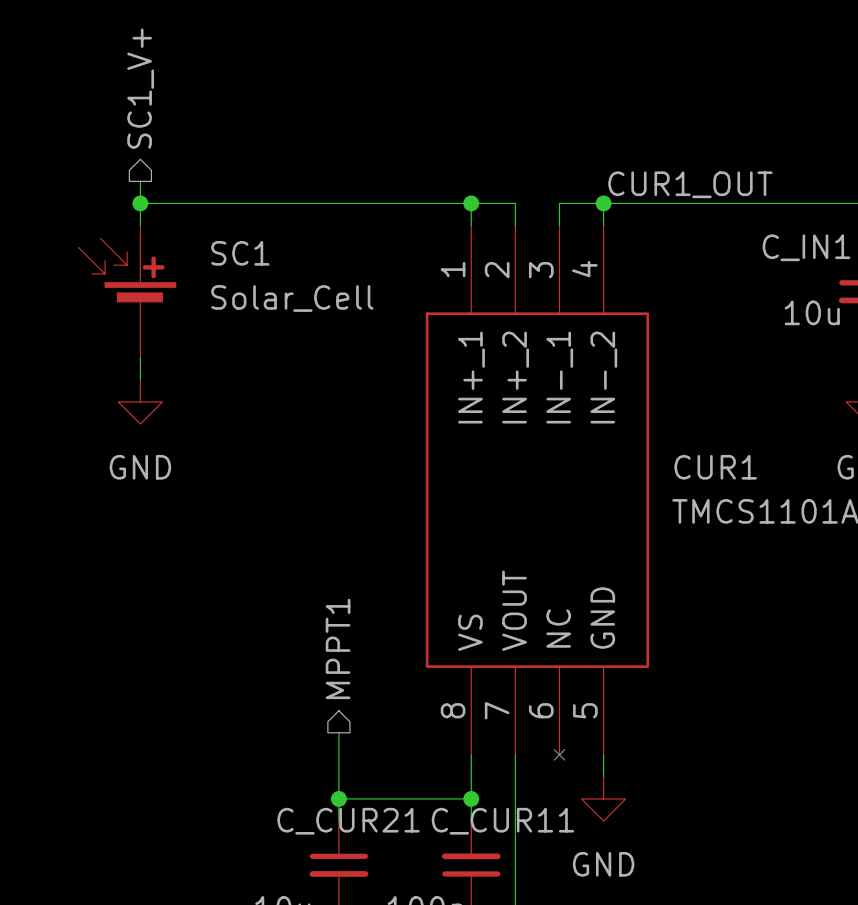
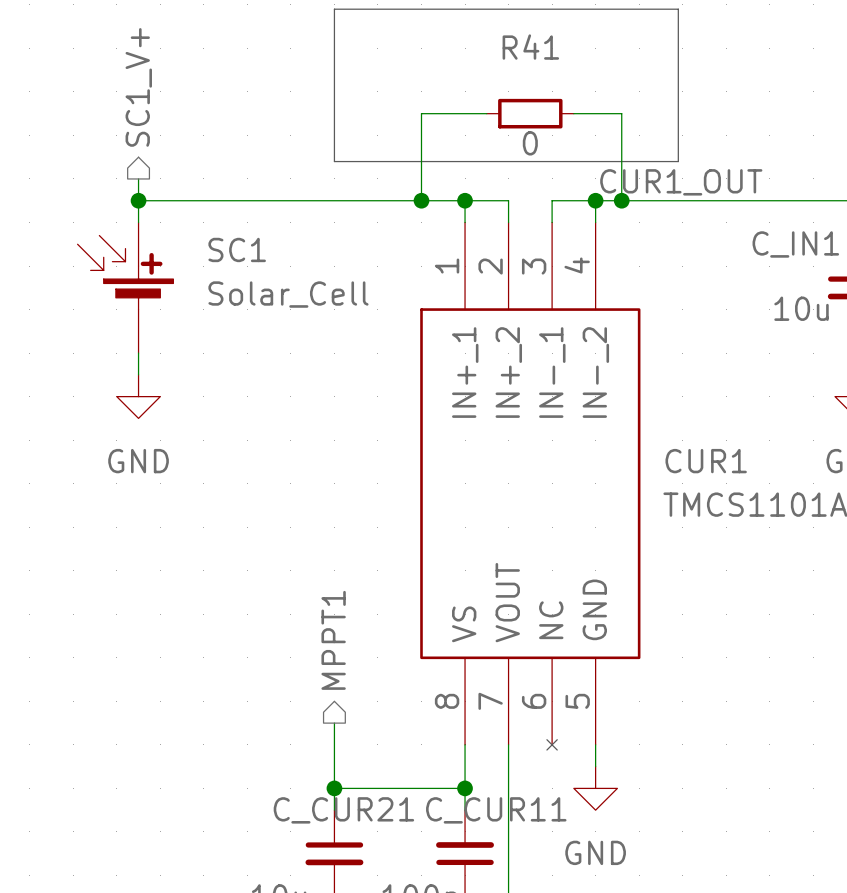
line: none -> (334, 9) (334, 161) (678, 161) (678, 9) (334, 9)
wire: none -> (486, 113) (421, 113) (421, 200)
R41: none -> 0 (530, 113)
wire: none -> (573, 113) (621, 113) (621, 200)
junction: none -> (421, 200)
junction: none -> (621, 200)

